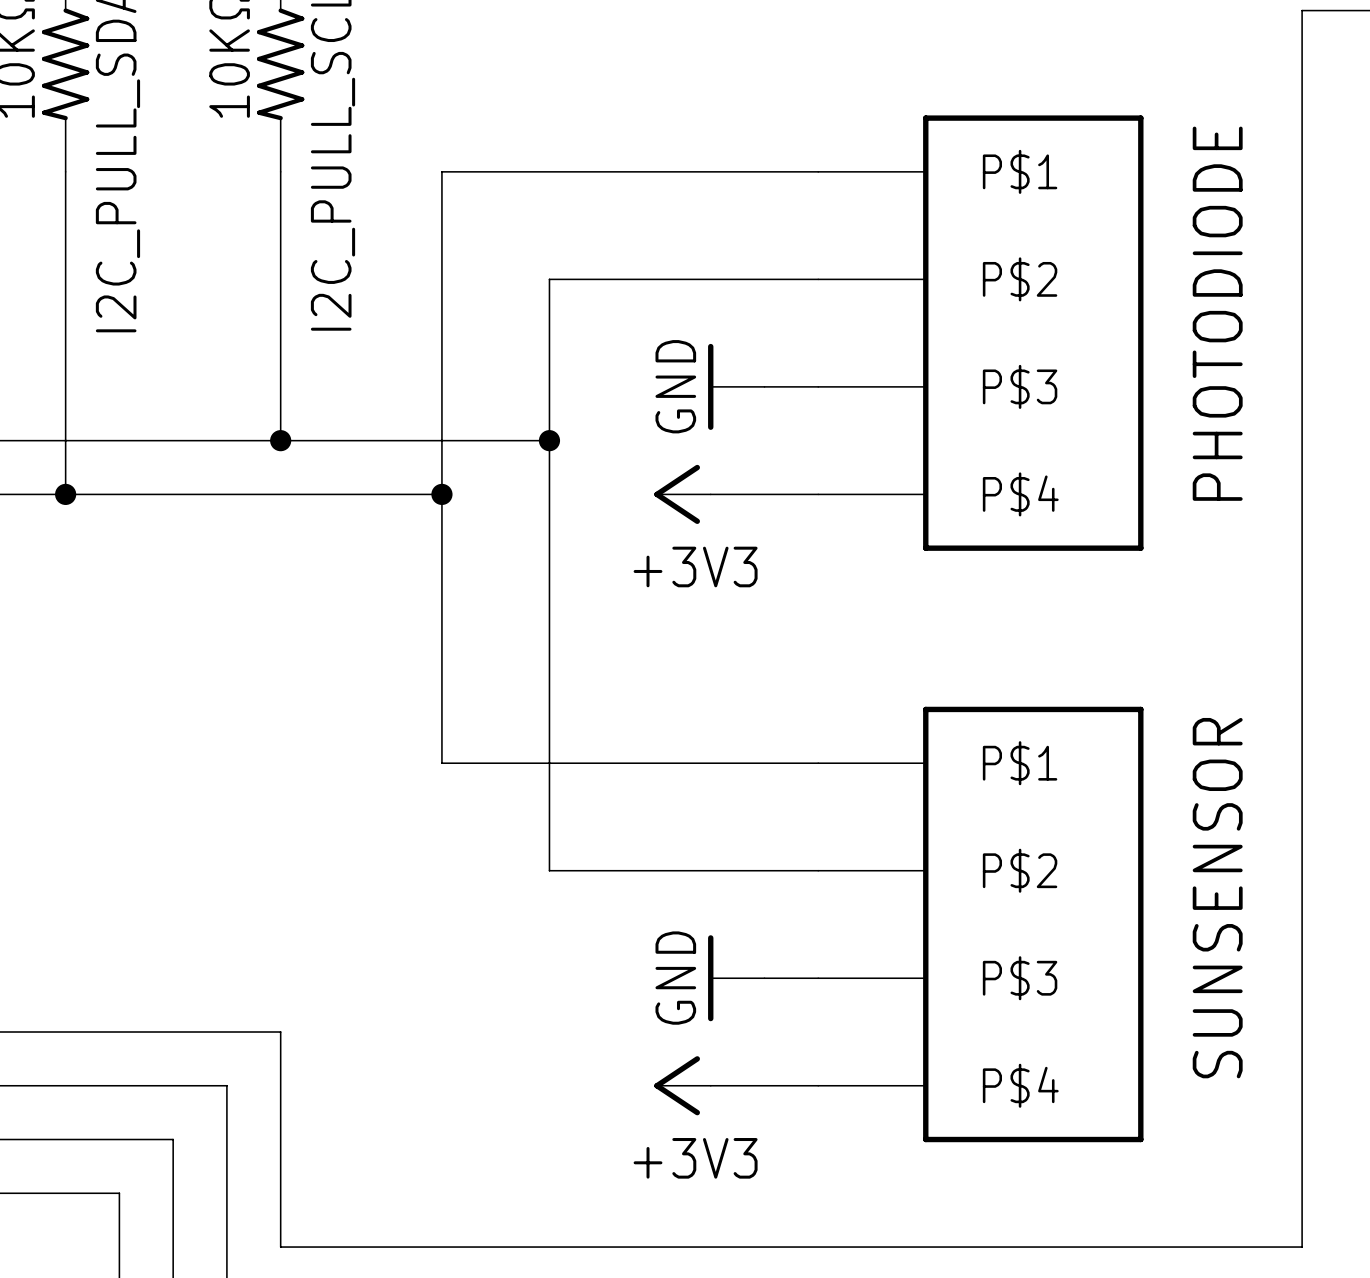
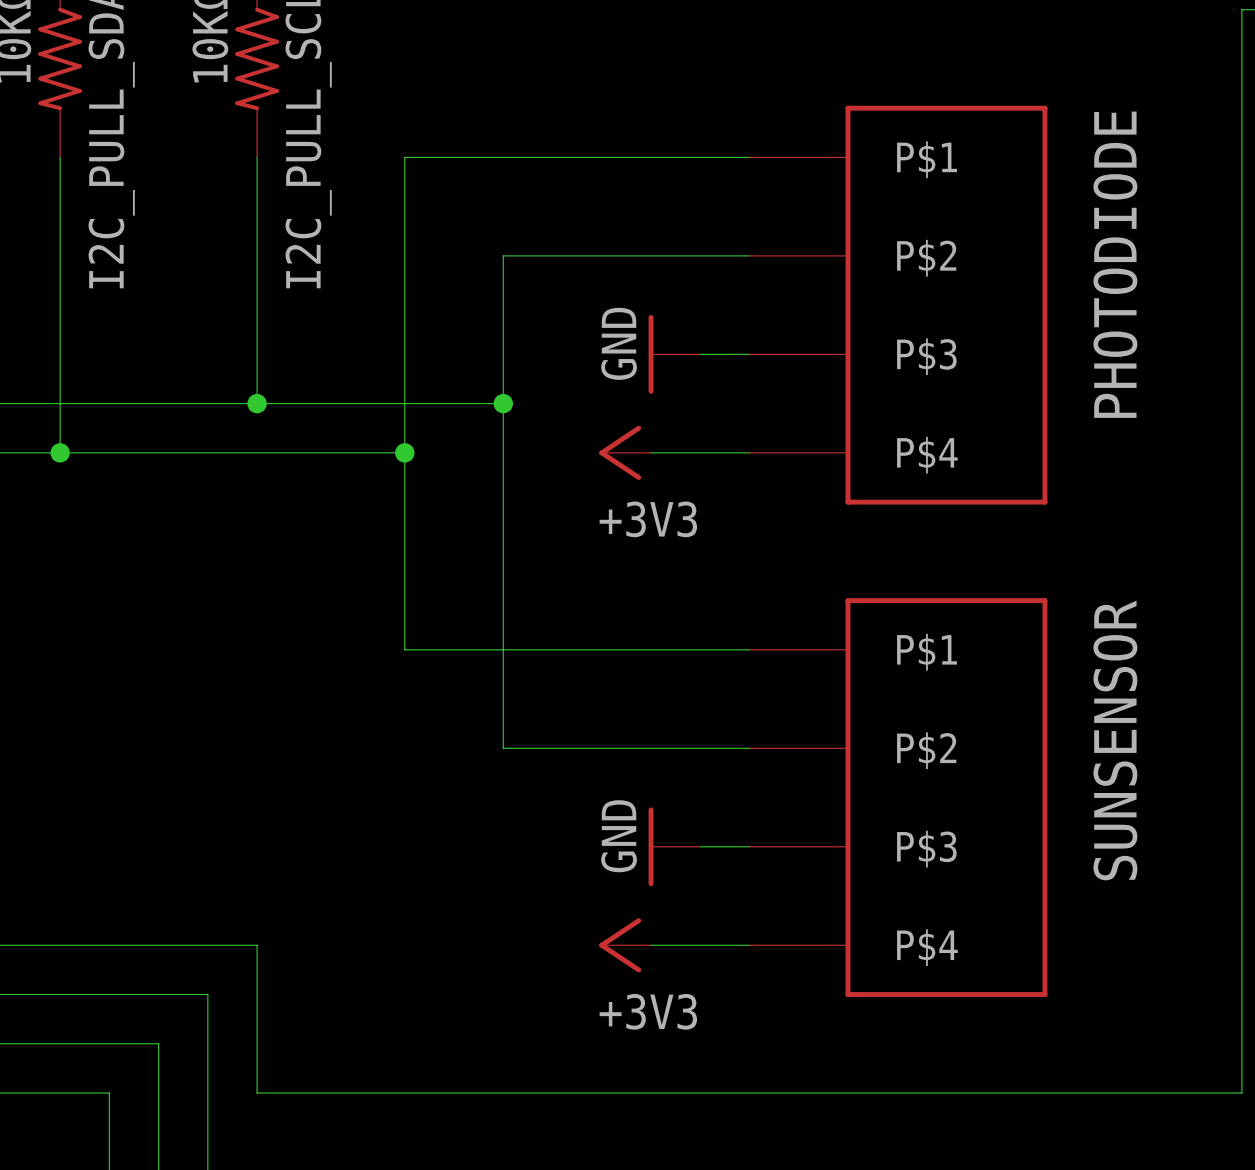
wire: (1355, 10) (1302, 10) (1302, 1247) (280, 1247) (280, 1193) -> (1241, 9) (1241, 1093) (257, 1093)
wire: (441, 709) (441, 763) (818, 763) -> (404, 649) (749, 649)
wire: (549, 816) (549, 870) (818, 870) -> (503, 748) (749, 748)
SUNSENSOR position: (980, 924) -> (898, 797)
power symbol position: GND (736, 978) -> GND (674, 846)
wire: (764, 978) (818, 978) -> (700, 846) (749, 846)
power symbol position: +3V3 (682, 1085) -> +3V3 (625, 945)
wire: (710, 1085) (818, 1085) -> (651, 945) (749, 945)

